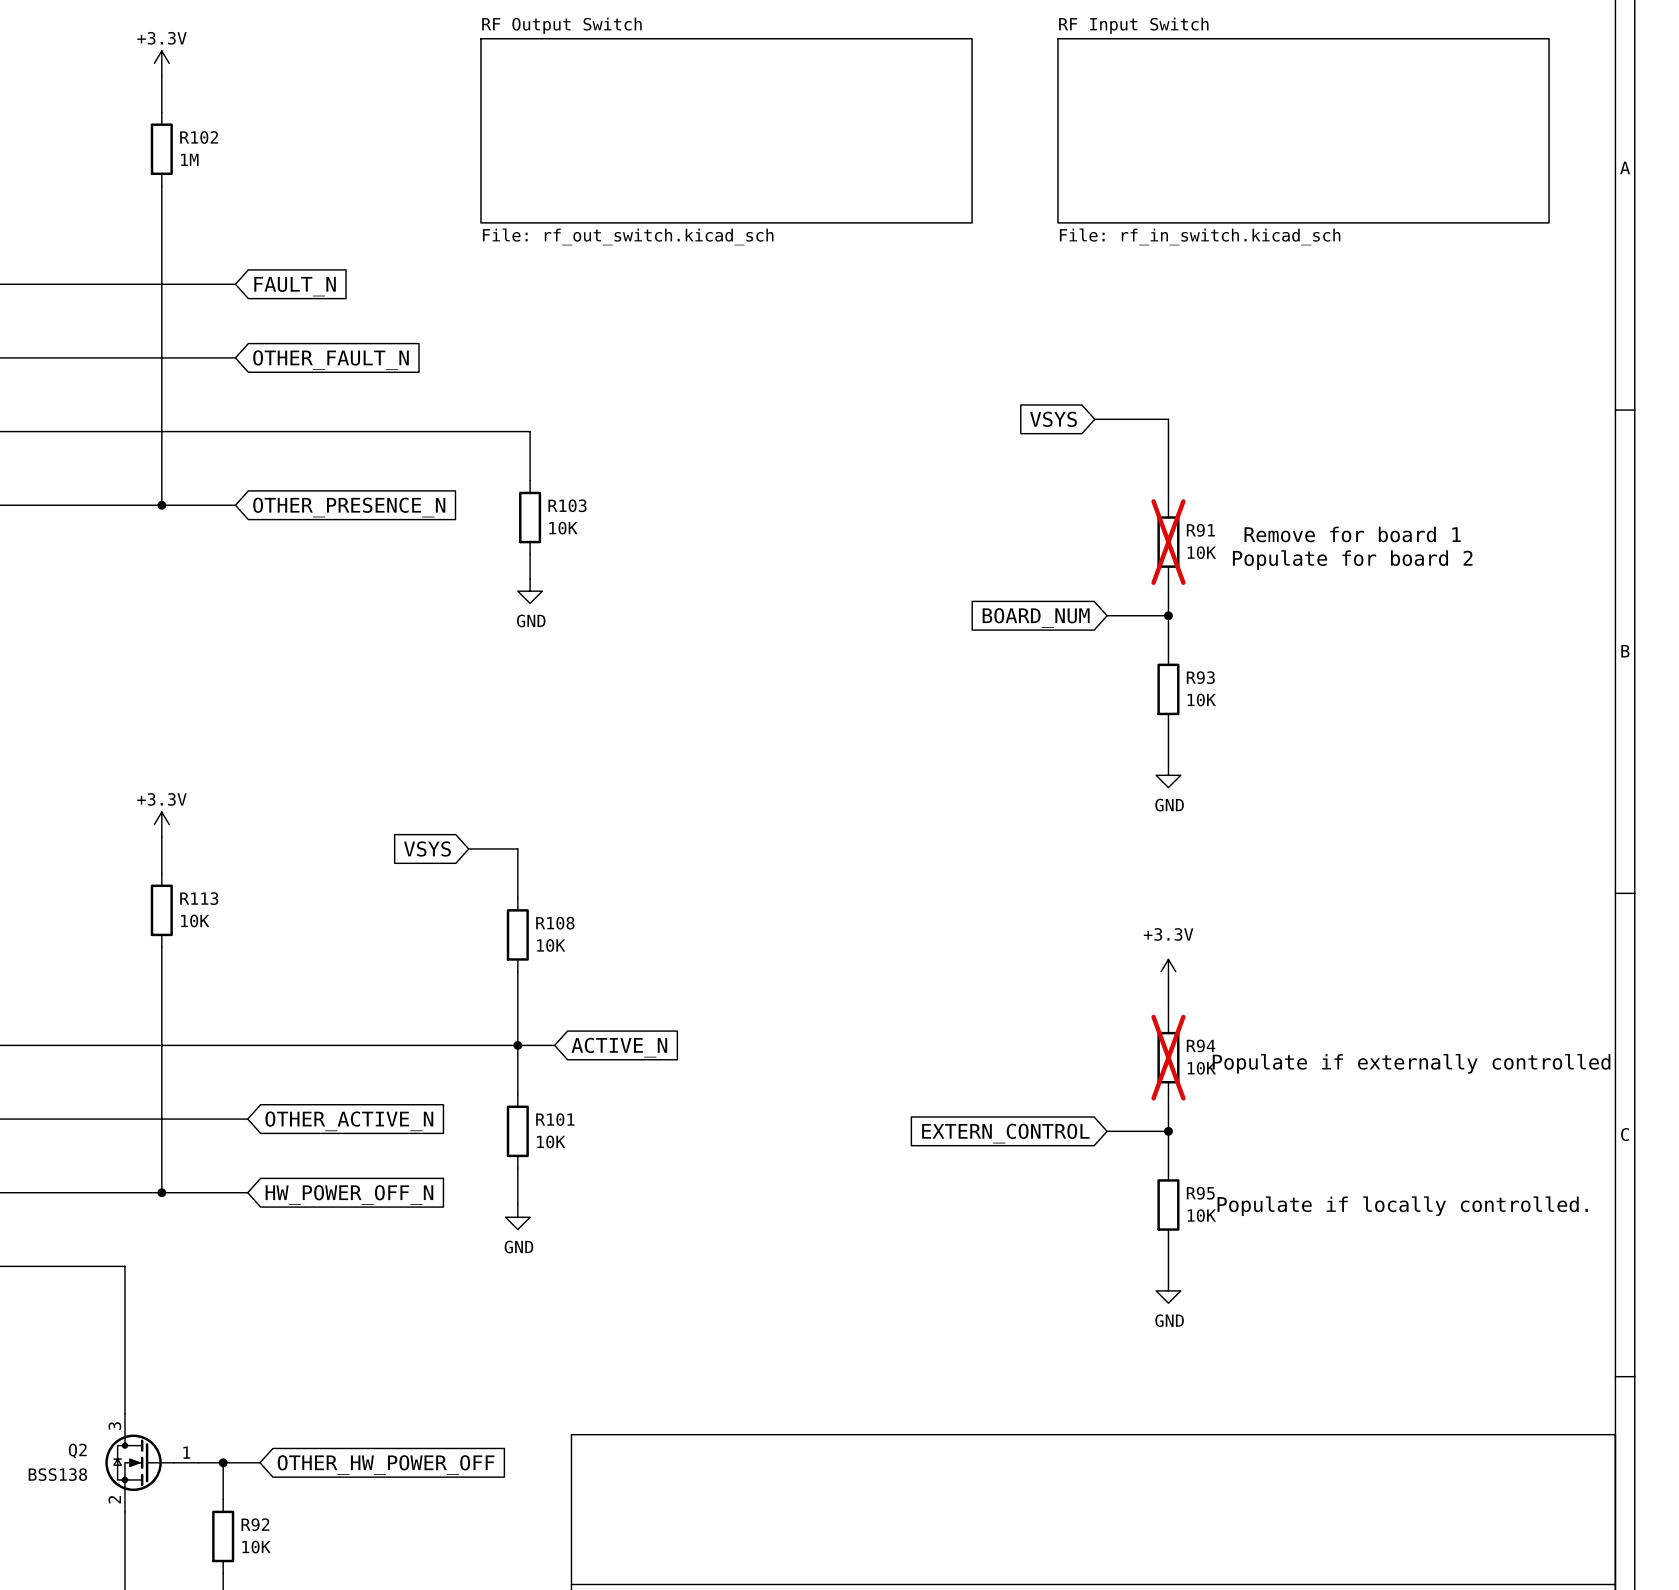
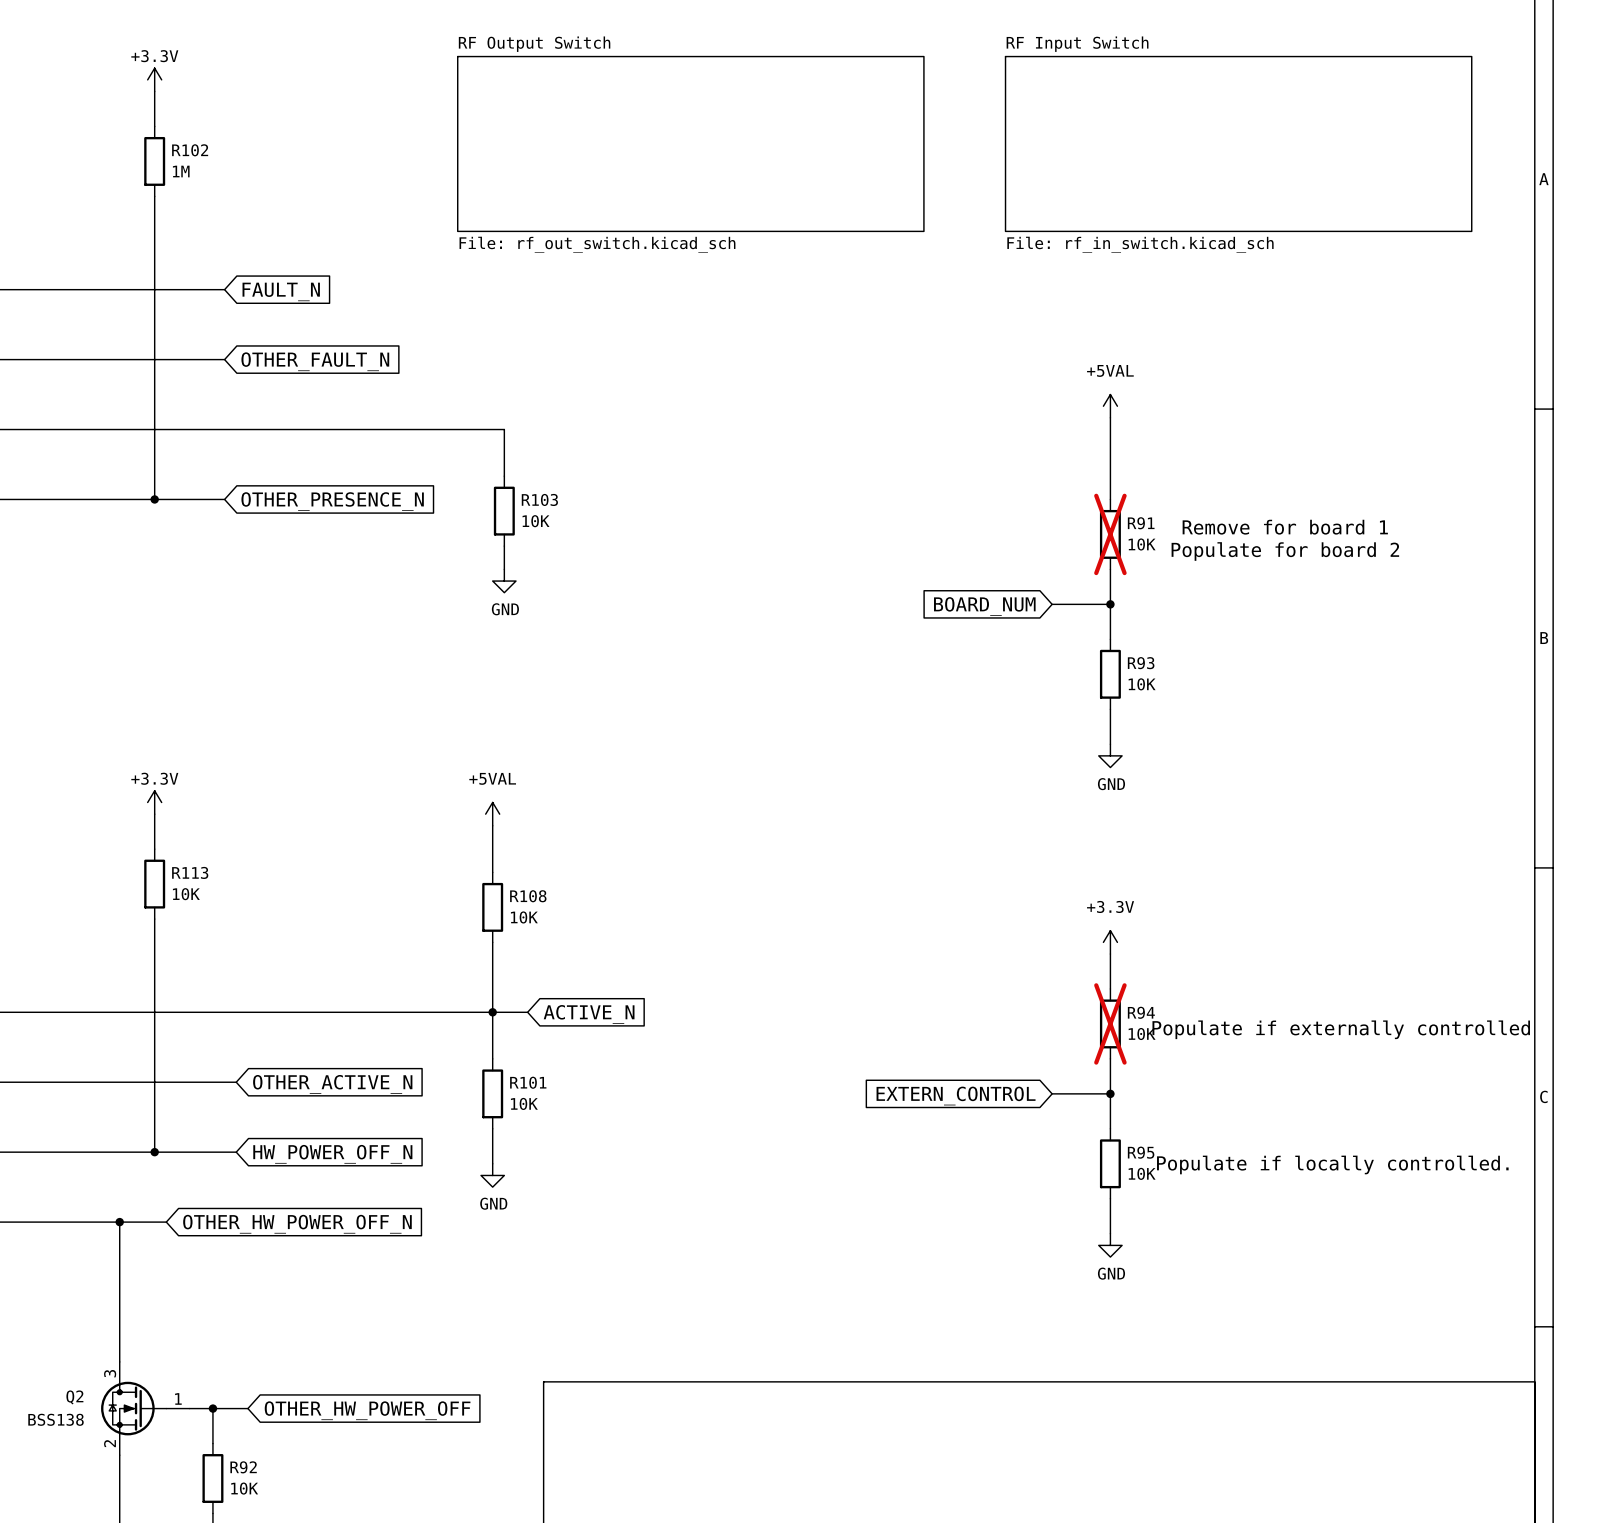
power symbol: none -> +5VAL (1110, 406)
global label: VSYS (1053, 419) -> none
wire: (1094, 419) (1168, 419) -> none
power symbol: none -> +5VAL (492, 814)
global label: VSYS (427, 848) -> none
wire: (468, 848) (517, 848) -> none
wire: none -> (119, 1222) (166, 1222)
junction: none -> (119, 1222)
global label: none -> OTHER_HW_POWER_OFF_N (297, 1224)

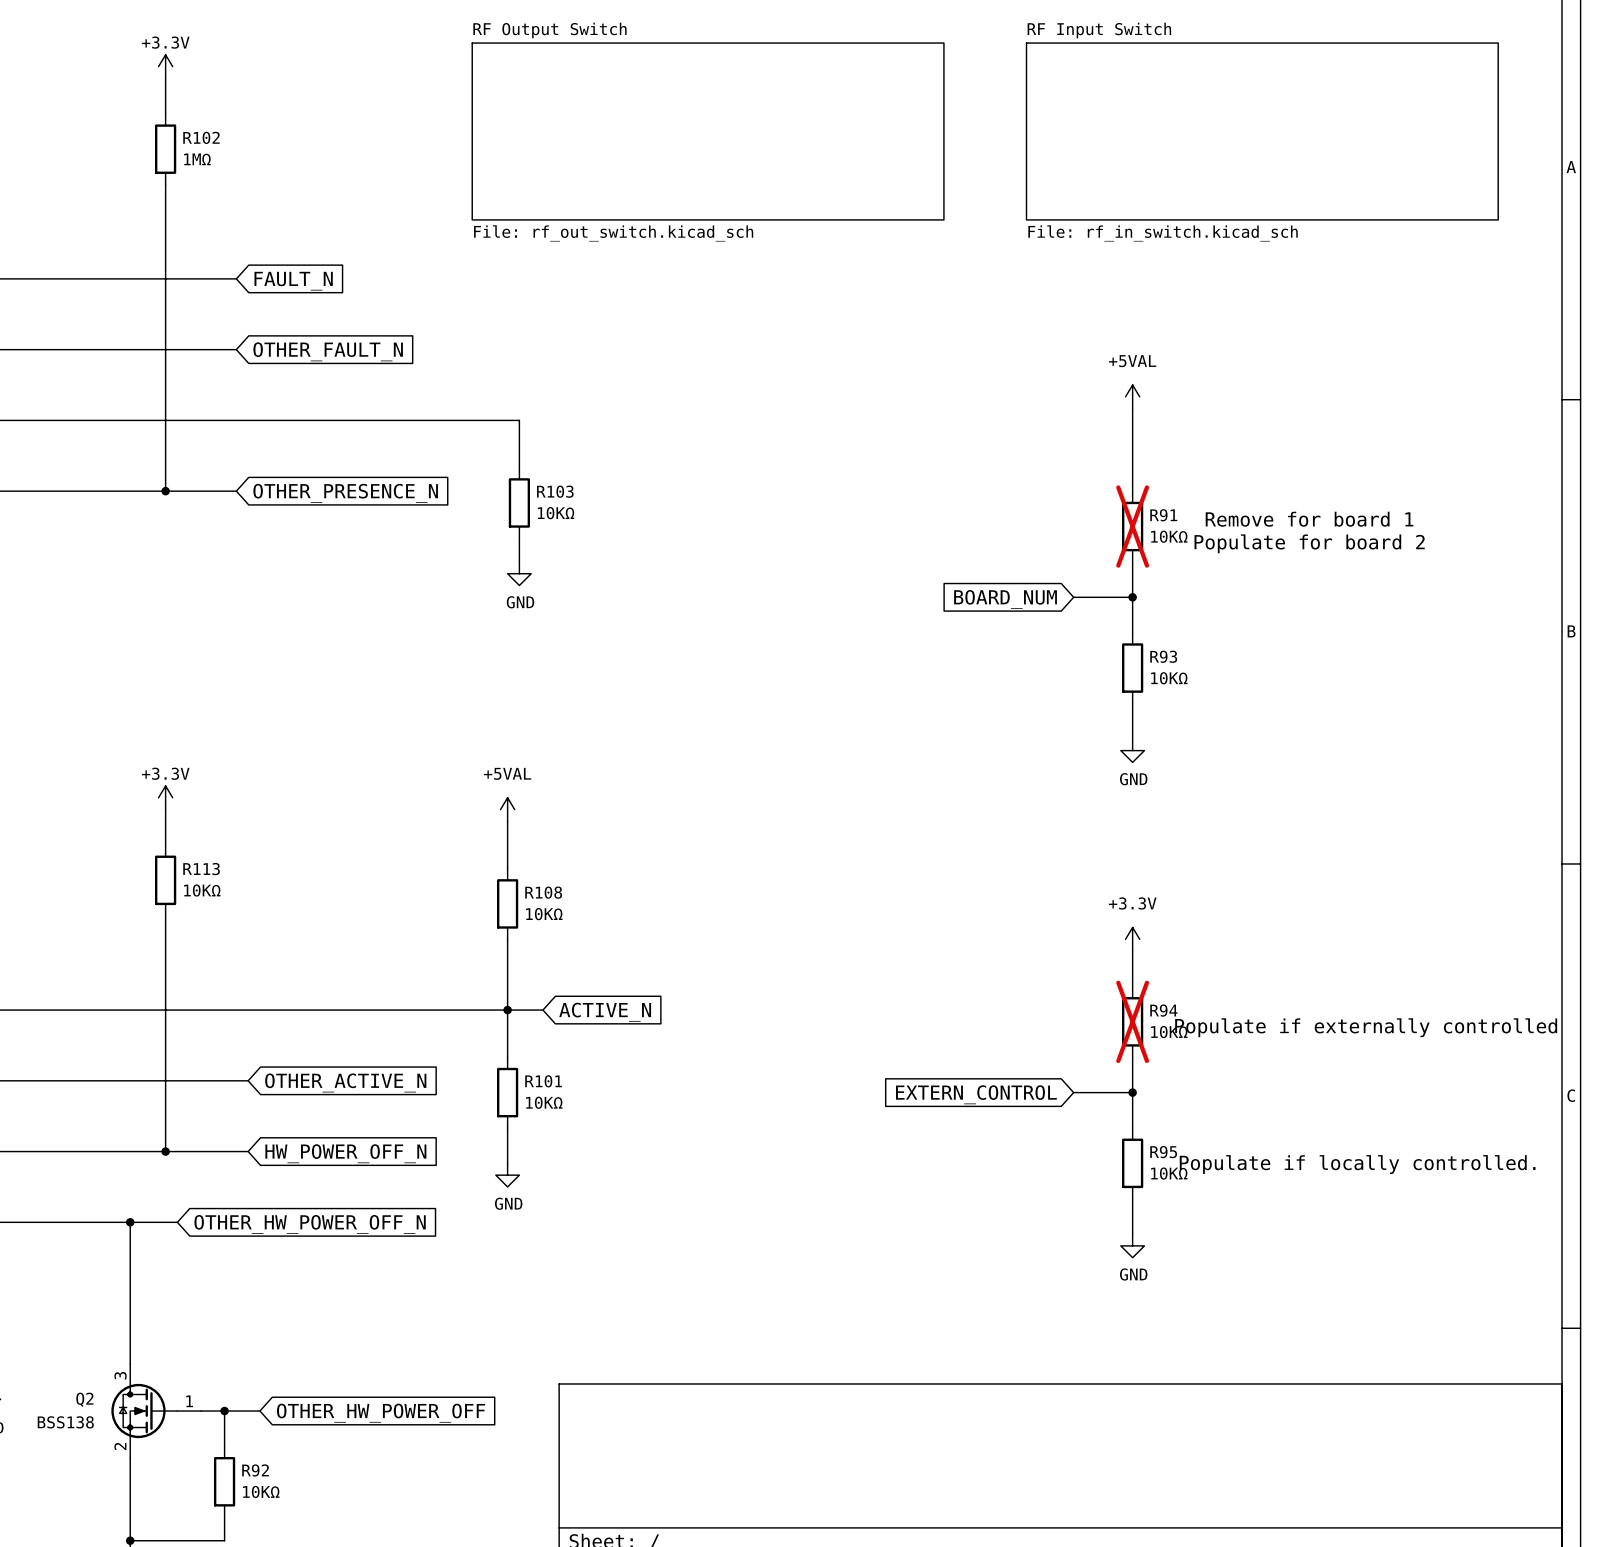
R102 value: 1M (181, 171) -> 1MΩ (197, 159)
R103 value: 10K (536, 521) -> 10KΩ (556, 513)
R91 value: 10K (1142, 544) -> 10KΩ (1169, 536)
R93 value: 10K (1142, 684) -> 10KΩ (1169, 678)
R113 value: 10K (186, 894) -> 10KΩ (202, 890)
R108 value: 10K (524, 917) -> 10KΩ (544, 914)
R94 value: 10K (1142, 1034) -> 10KΩ (1169, 1032)
R101 value: 10K (524, 1103) -> 10KΩ (544, 1102)
R95 value: 10K (1142, 1173) -> 10KΩ (1169, 1173)
R92 value: 10K (244, 1488) -> 10KΩ (261, 1491)

